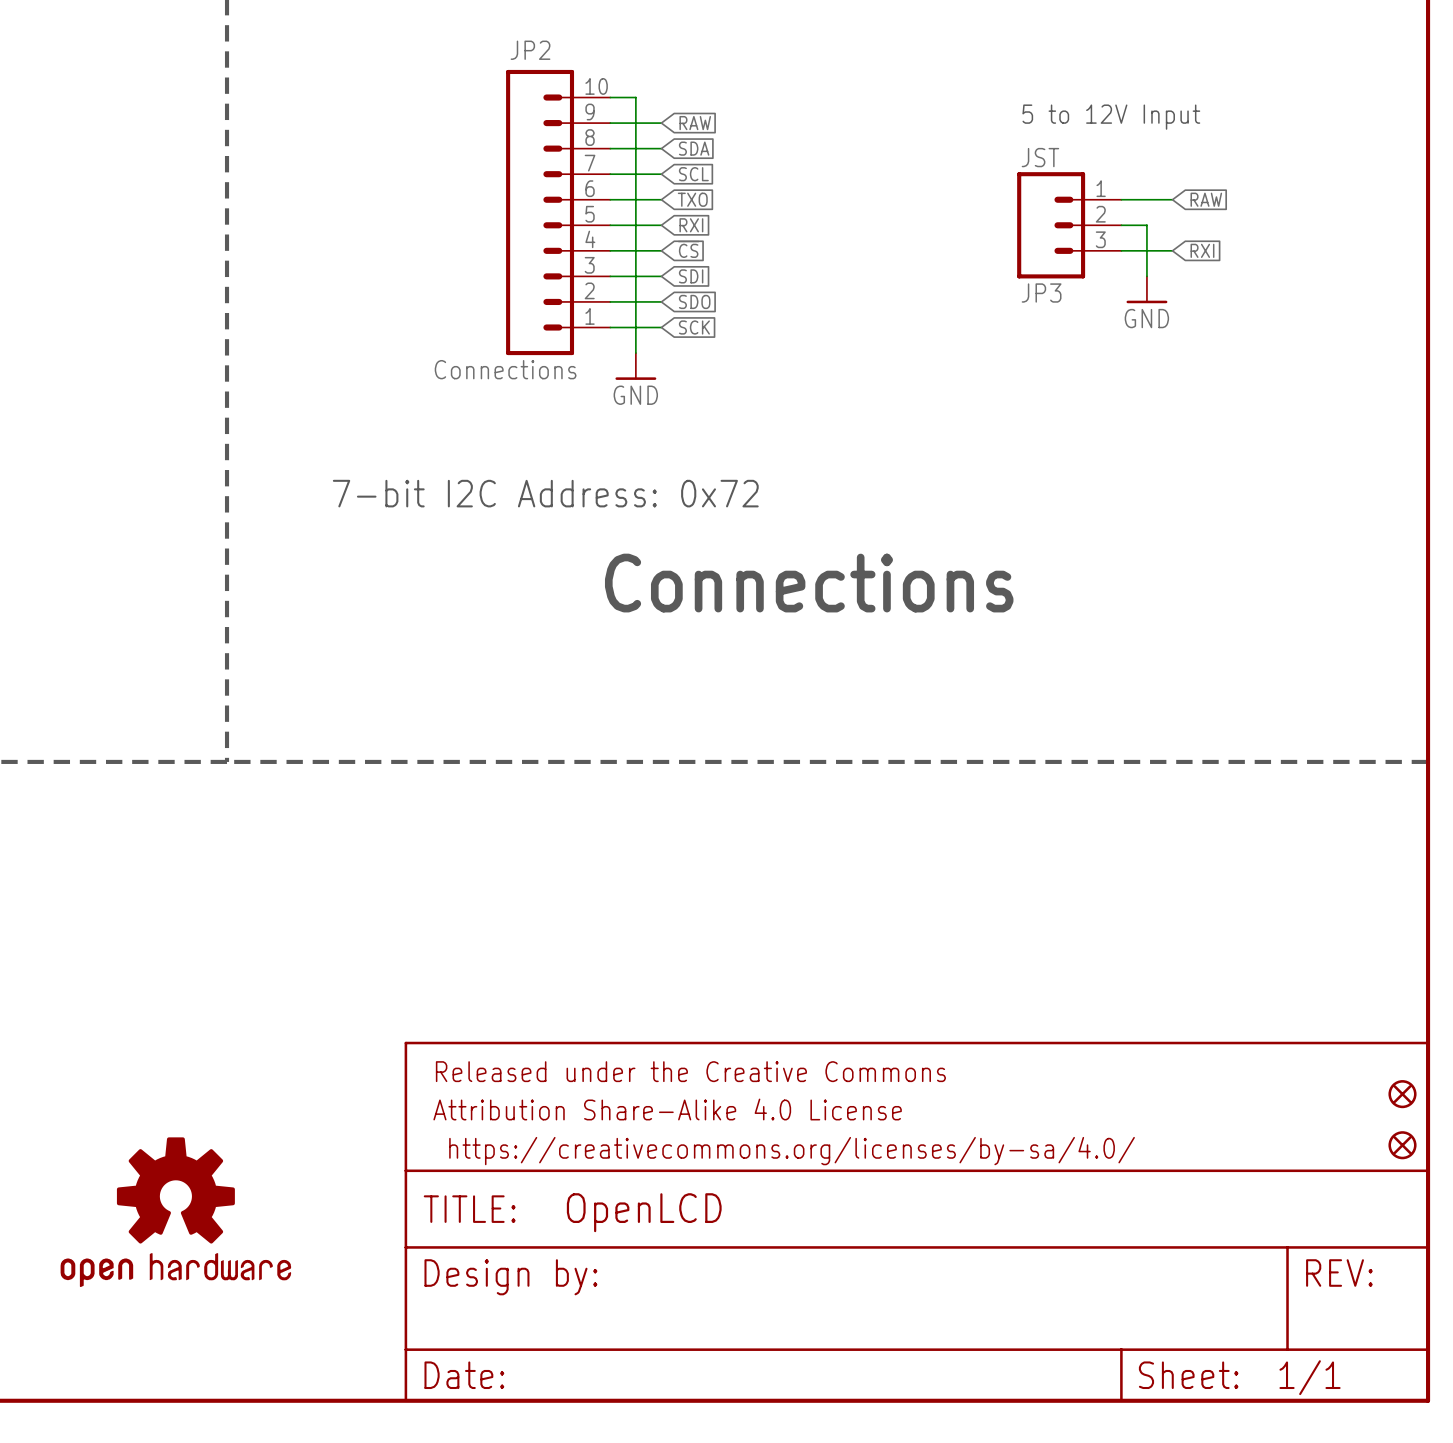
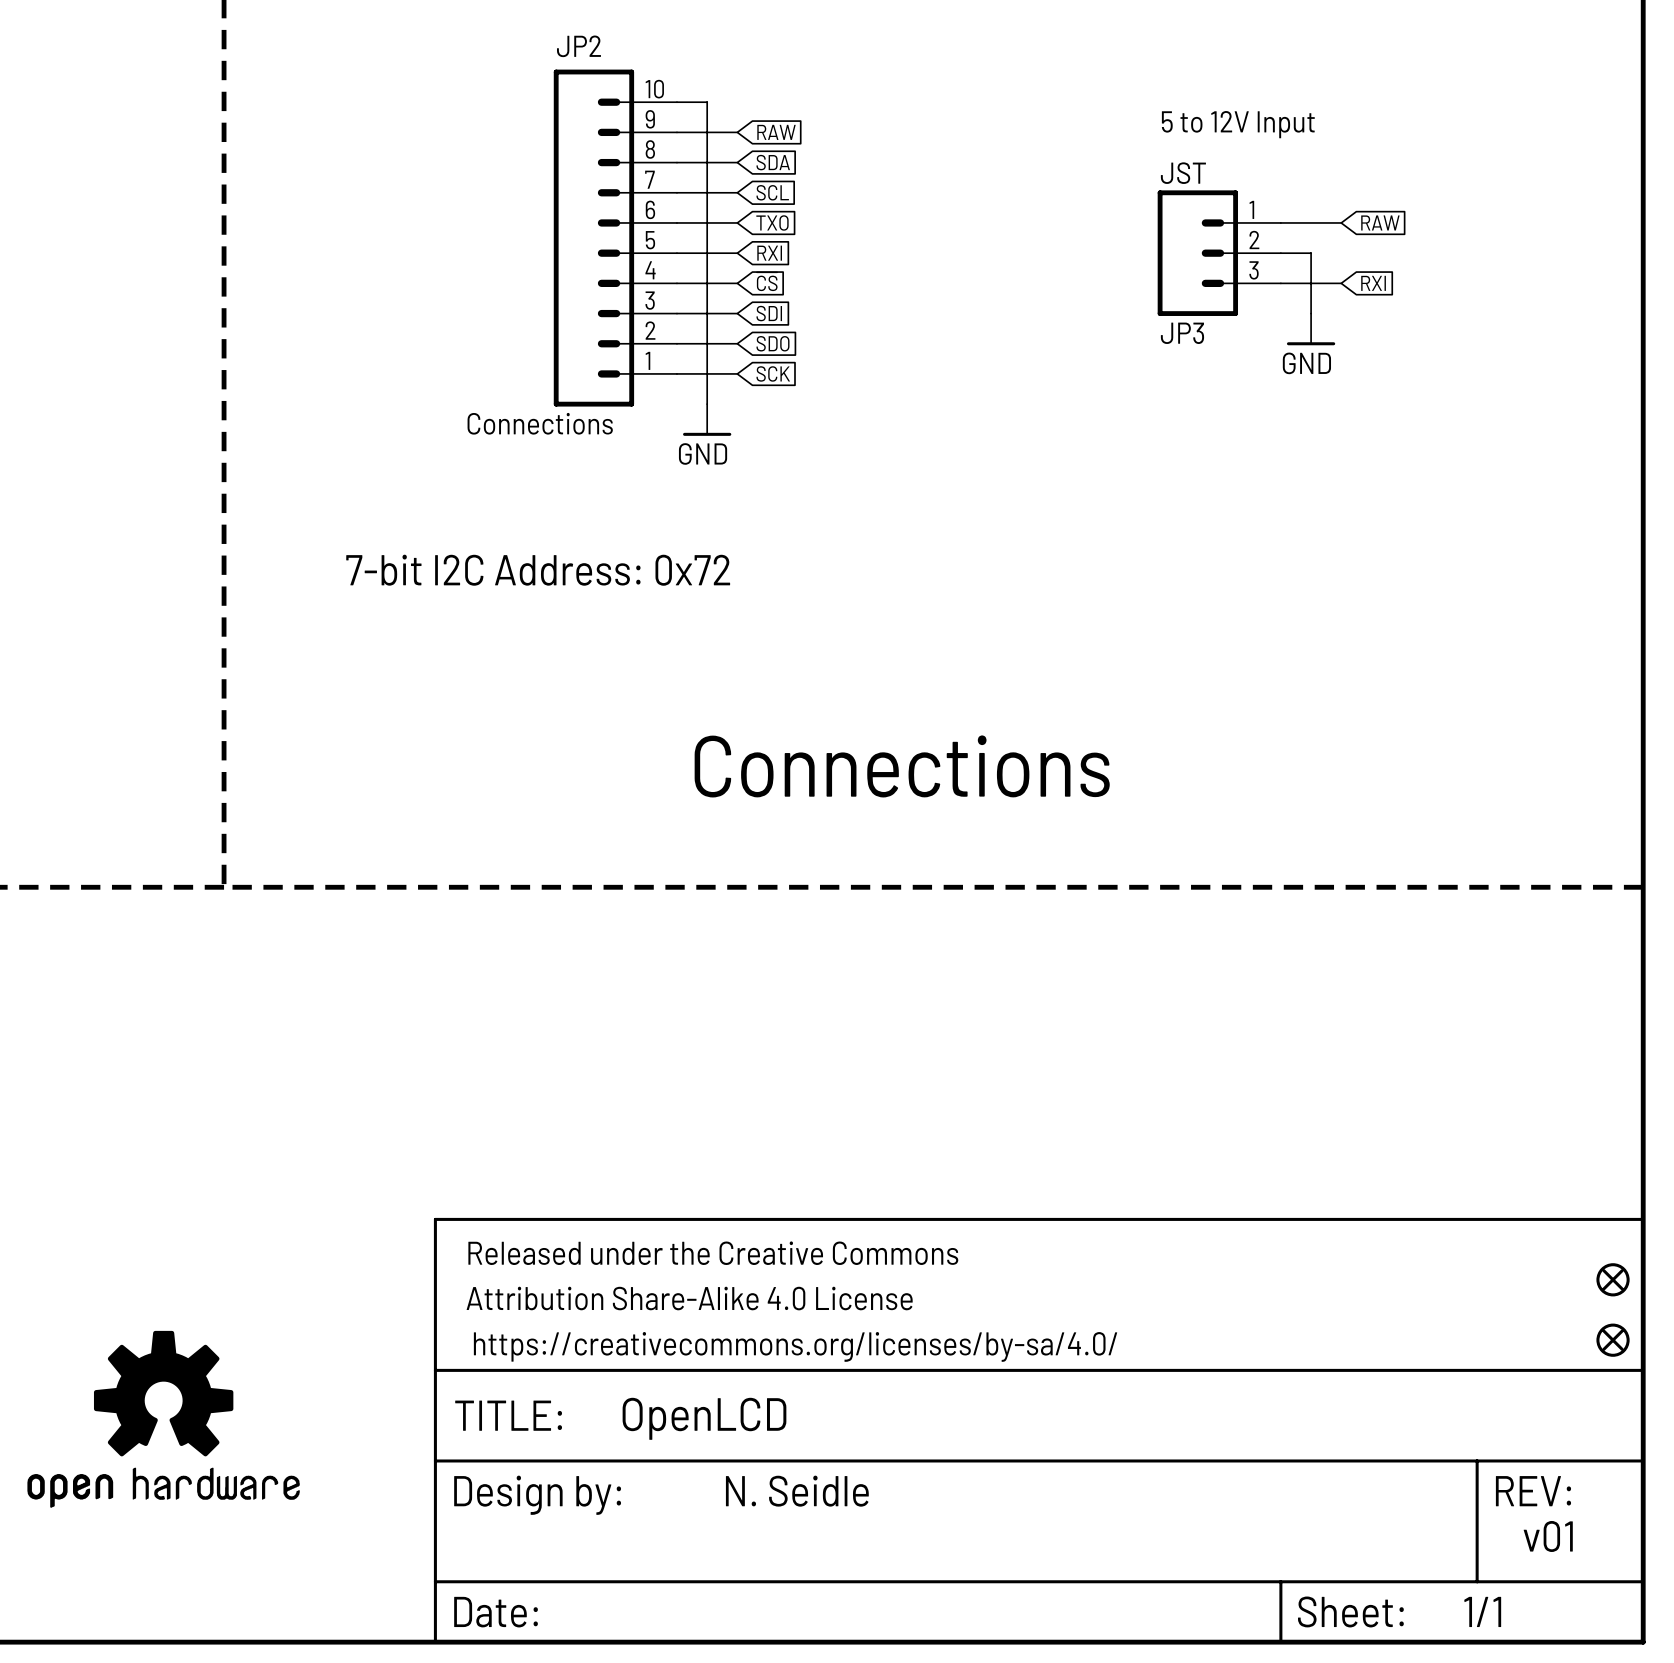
text position: Connections (809, 583) -> Connections (902, 766)
text: none -> N. Seidle (797, 1491)
text: none -> v01 (1548, 1536)

